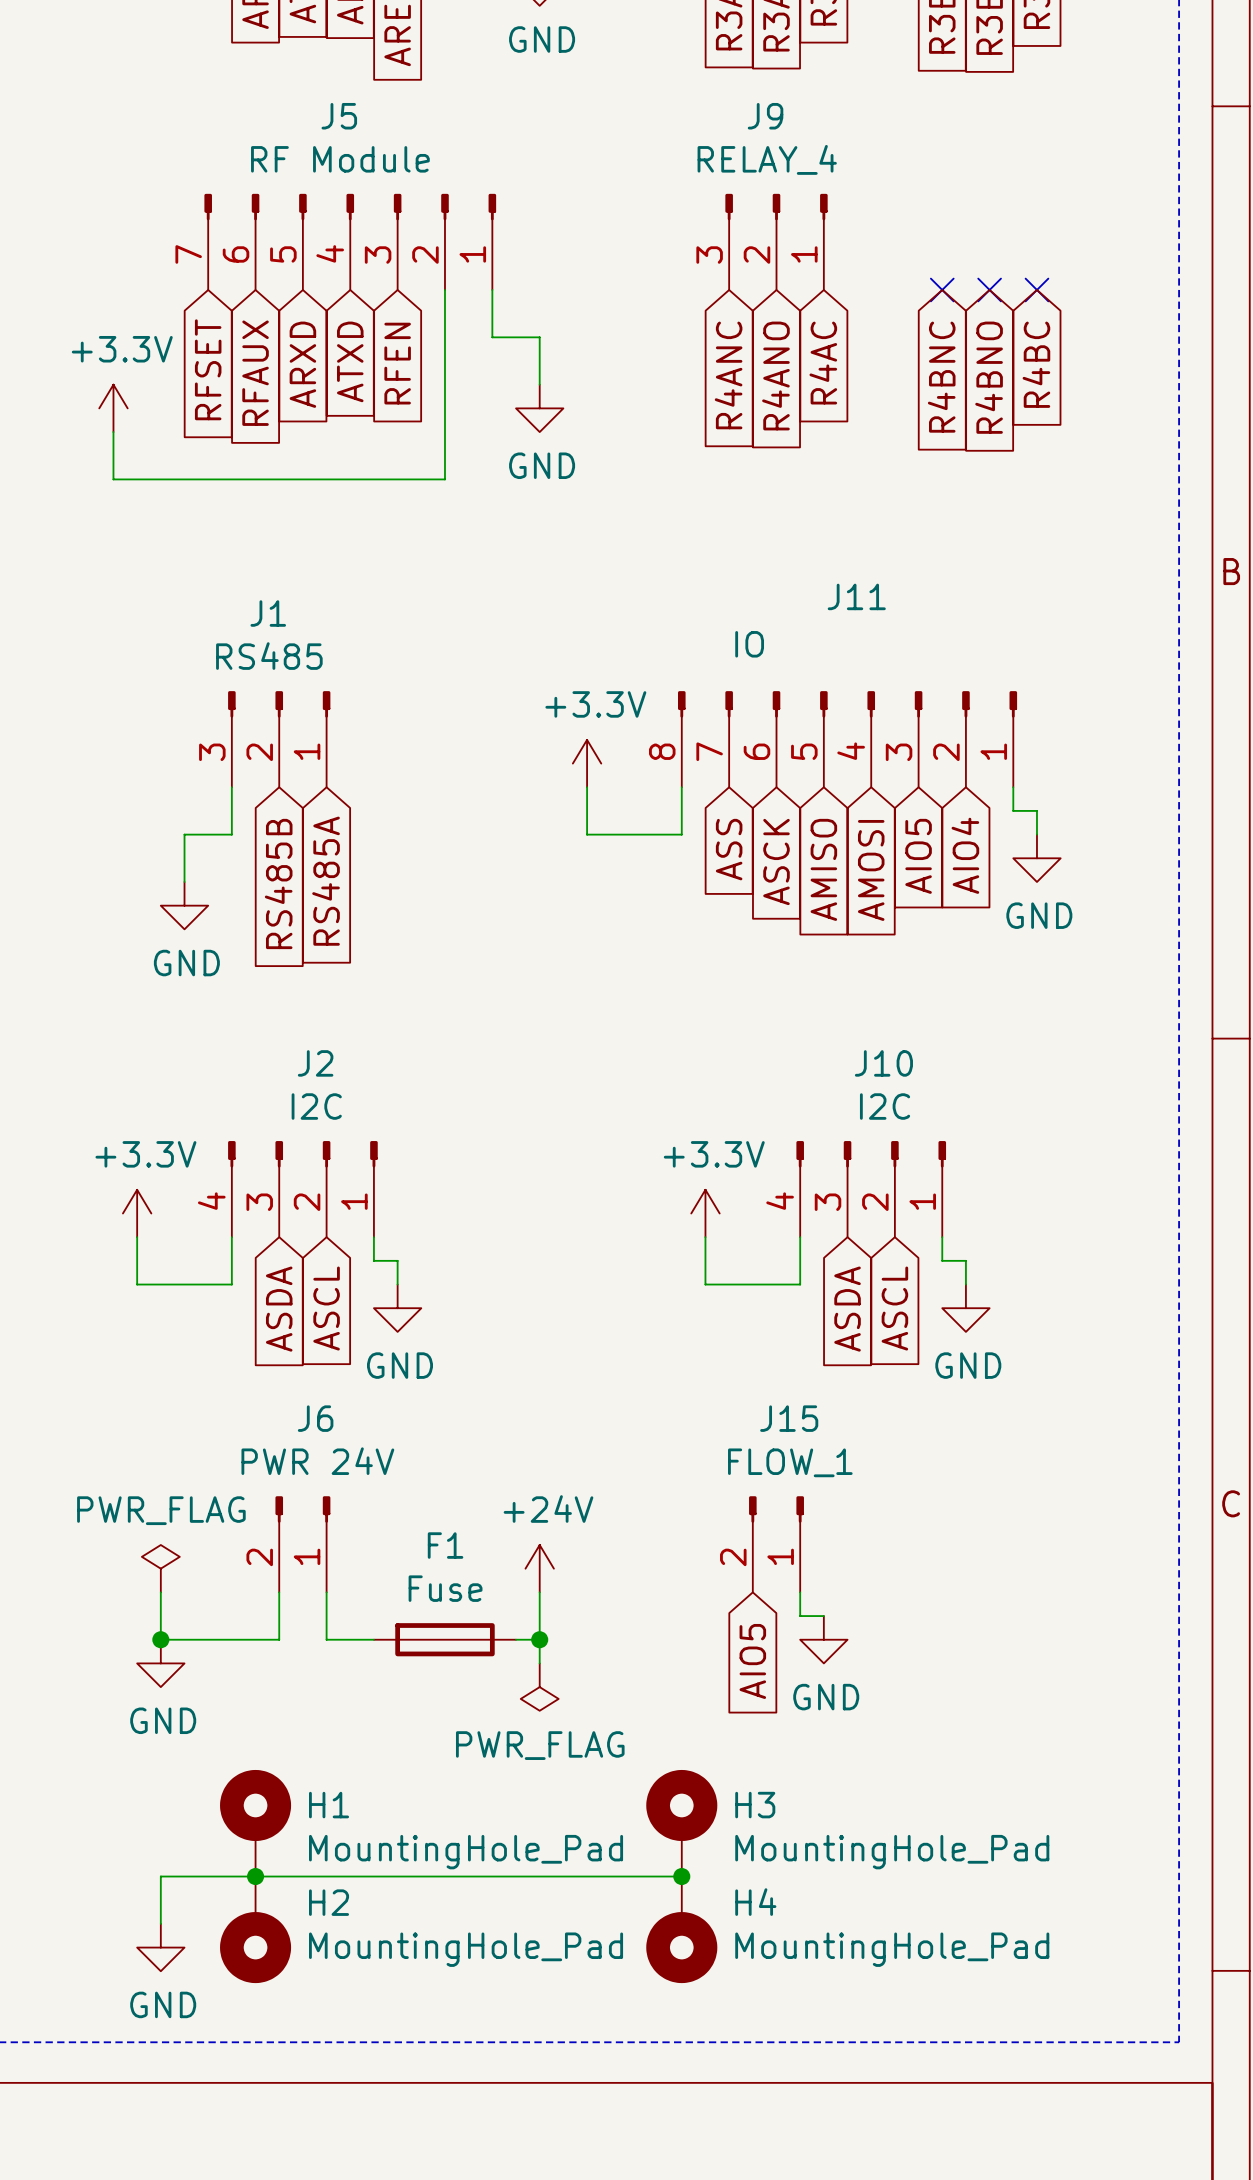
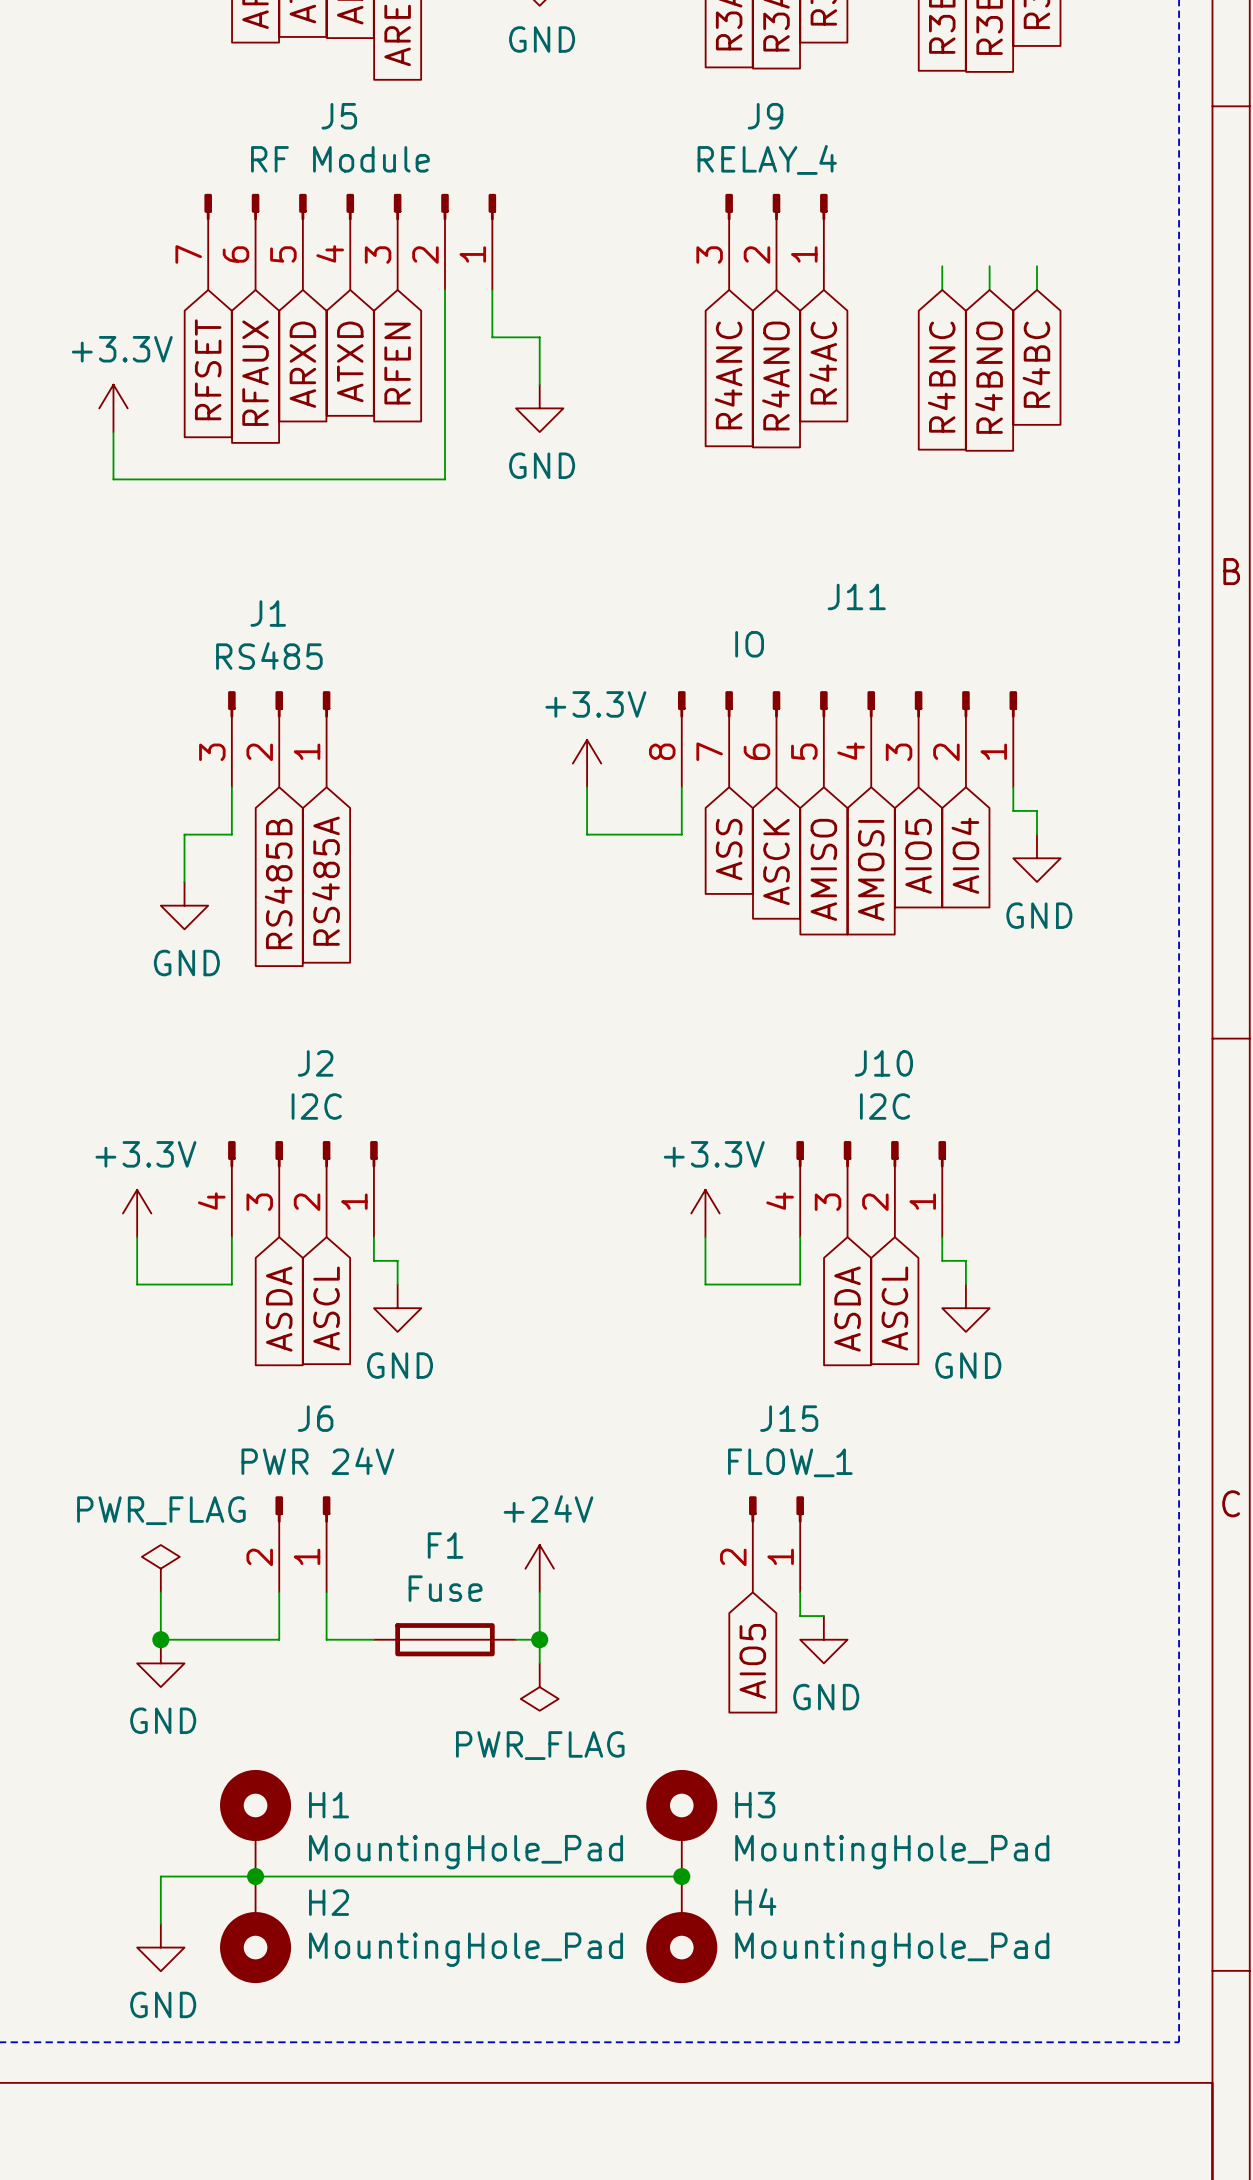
wire: none -> (942, 266) (942, 289)
wire: none -> (989, 266) (989, 289)
wire: none -> (1036, 266) (1036, 289)
no-connect mark: (942, 289) -> none
no-connect mark: (989, 289) -> none
no-connect mark: (1036, 289) -> none

